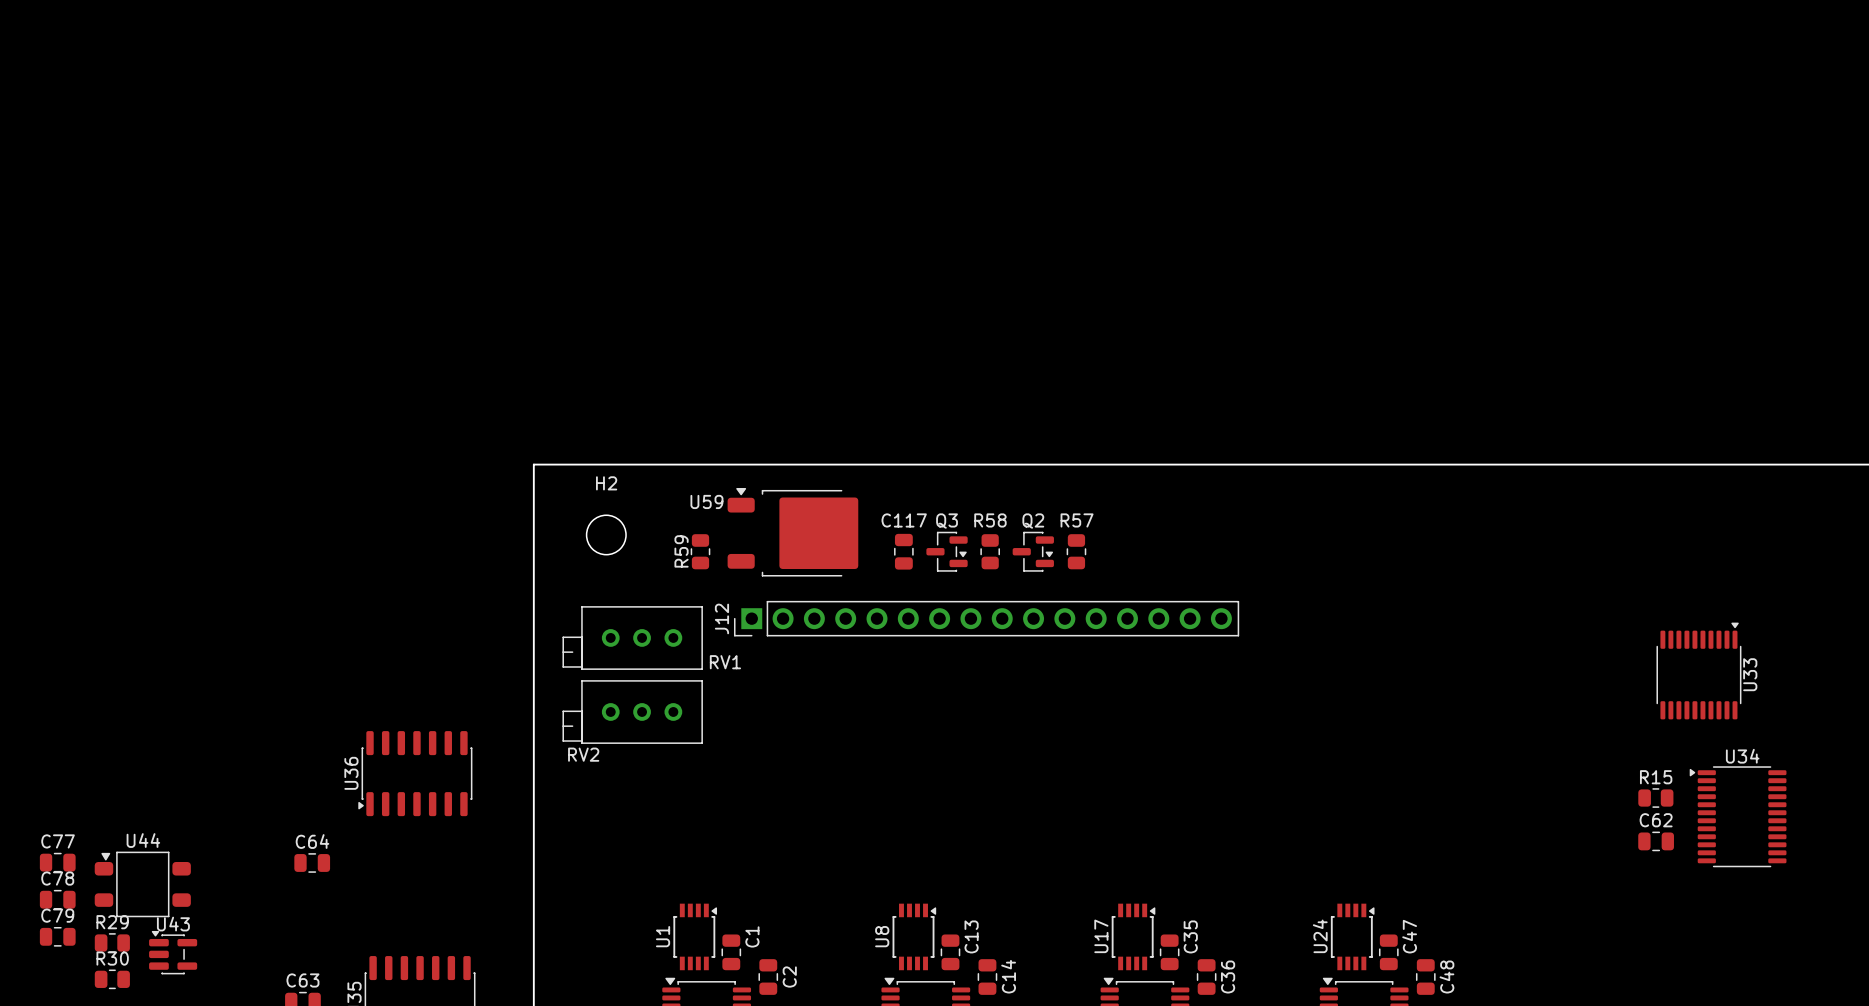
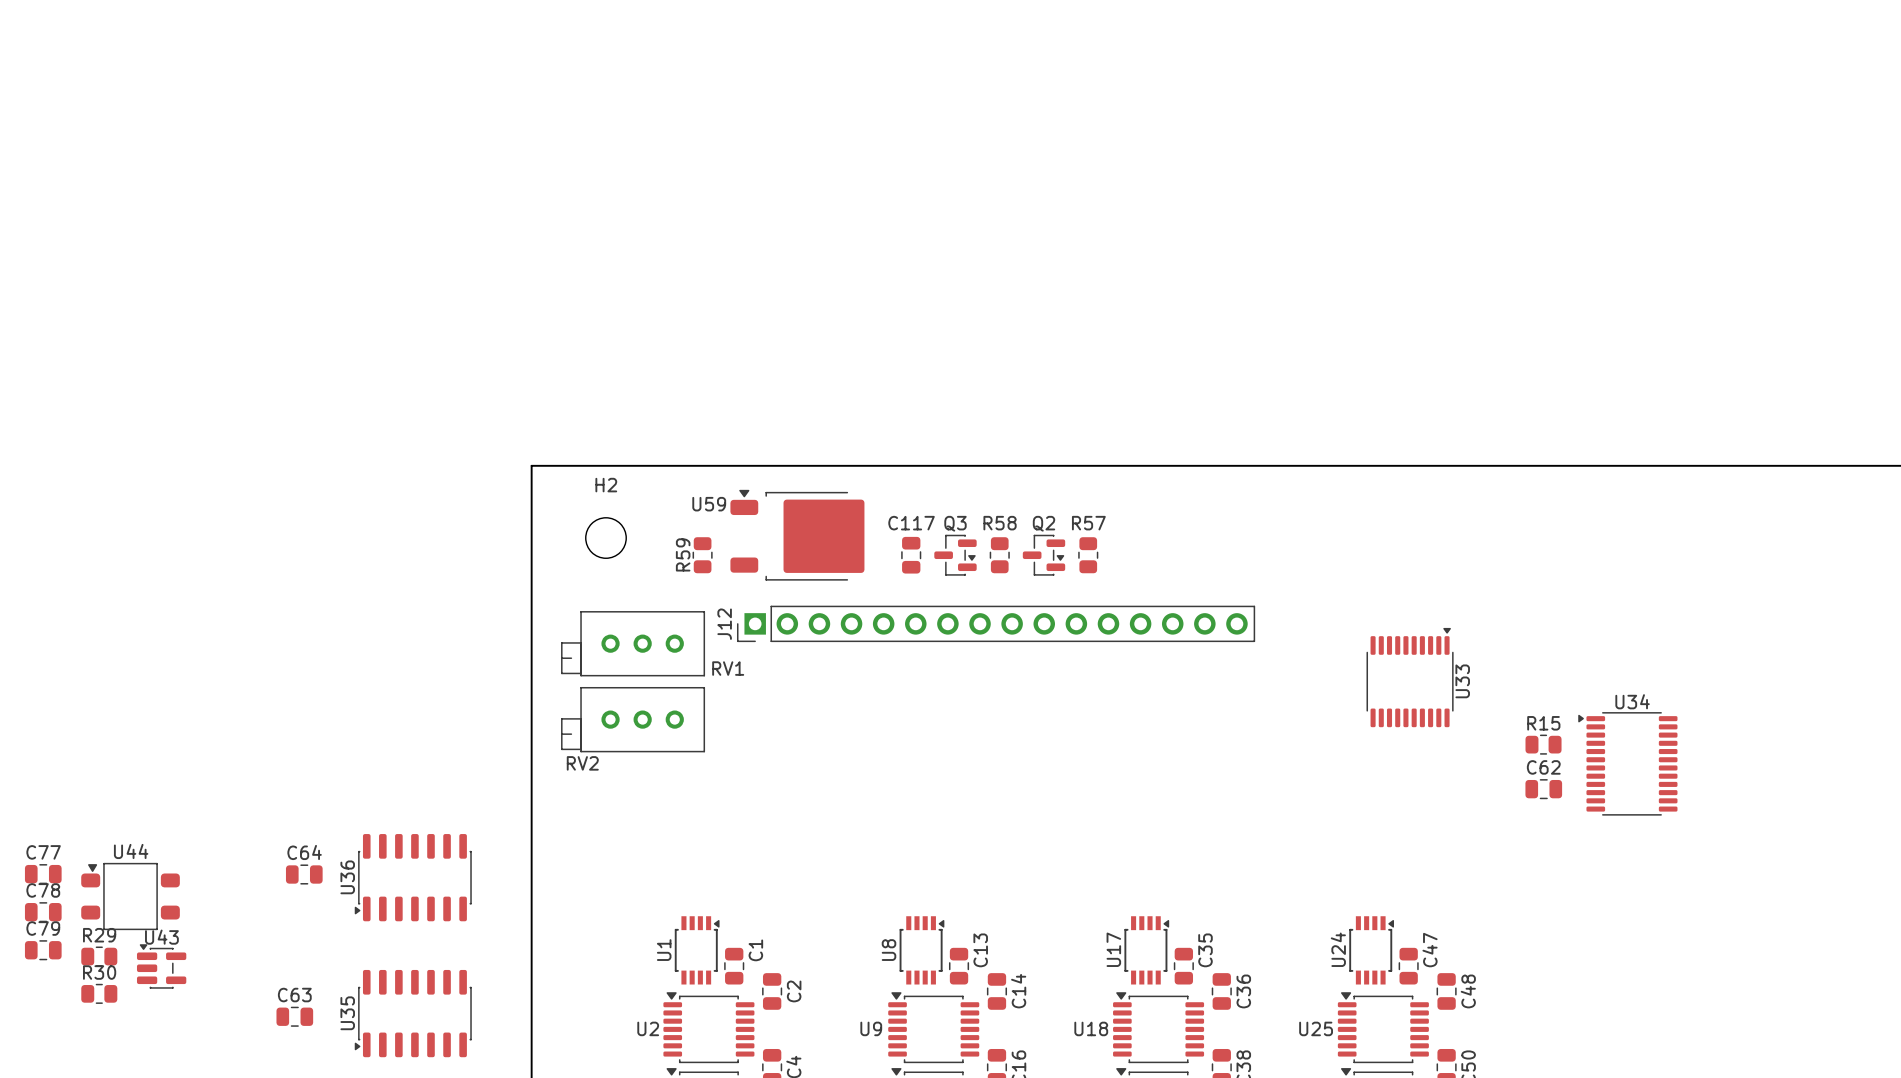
U33 position: (1698, 670) -> (1410, 677)
U36 position: (415, 773) -> (413, 877)
R15 position: (1655, 798) -> (1543, 744)
U34 position: (1738, 816) -> (1627, 763)
C62 position: (1656, 841) -> (1543, 789)

